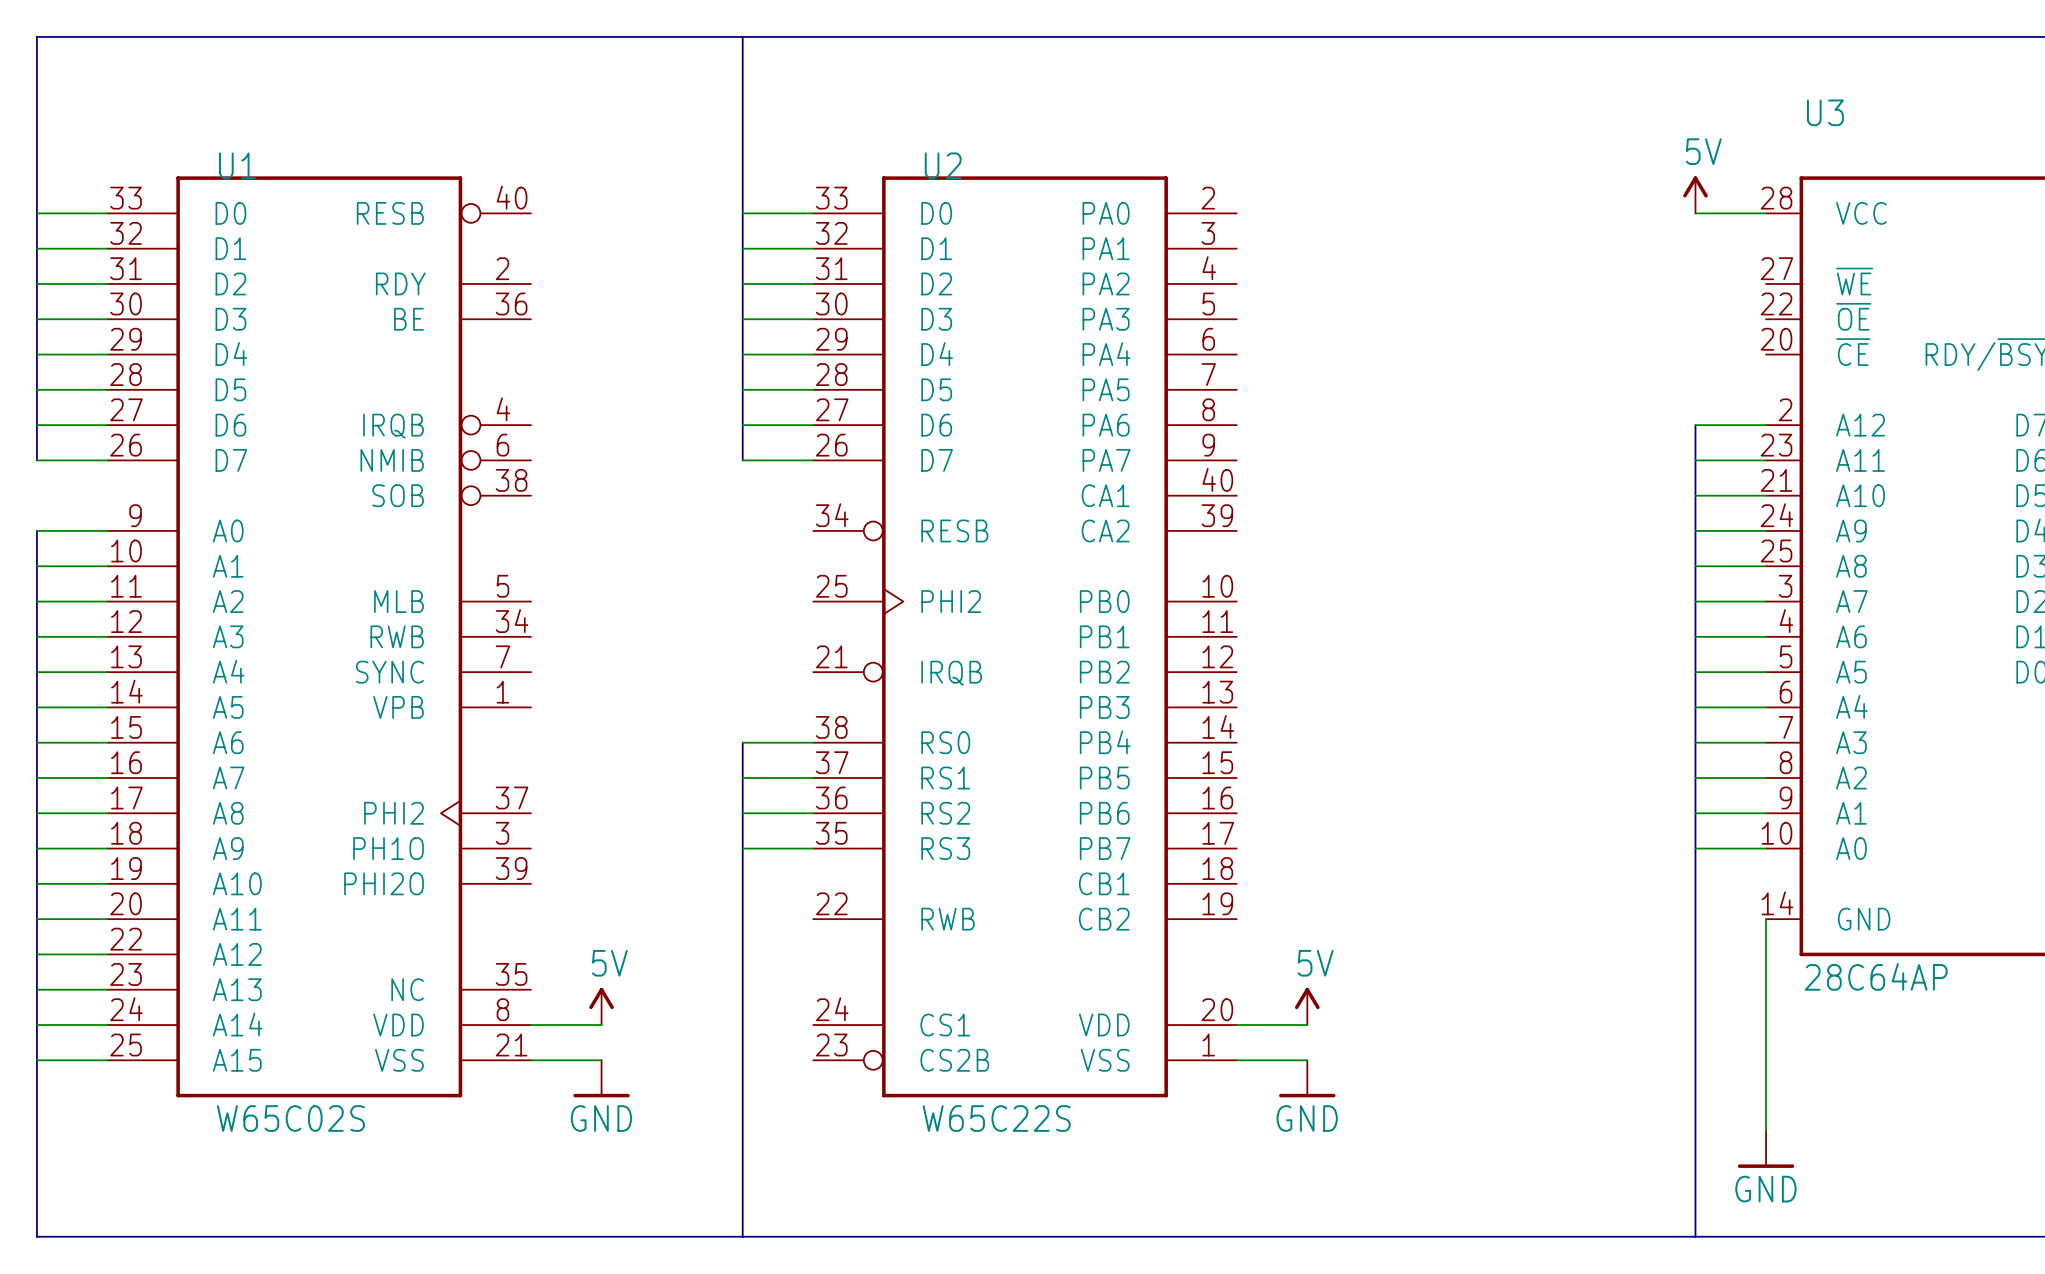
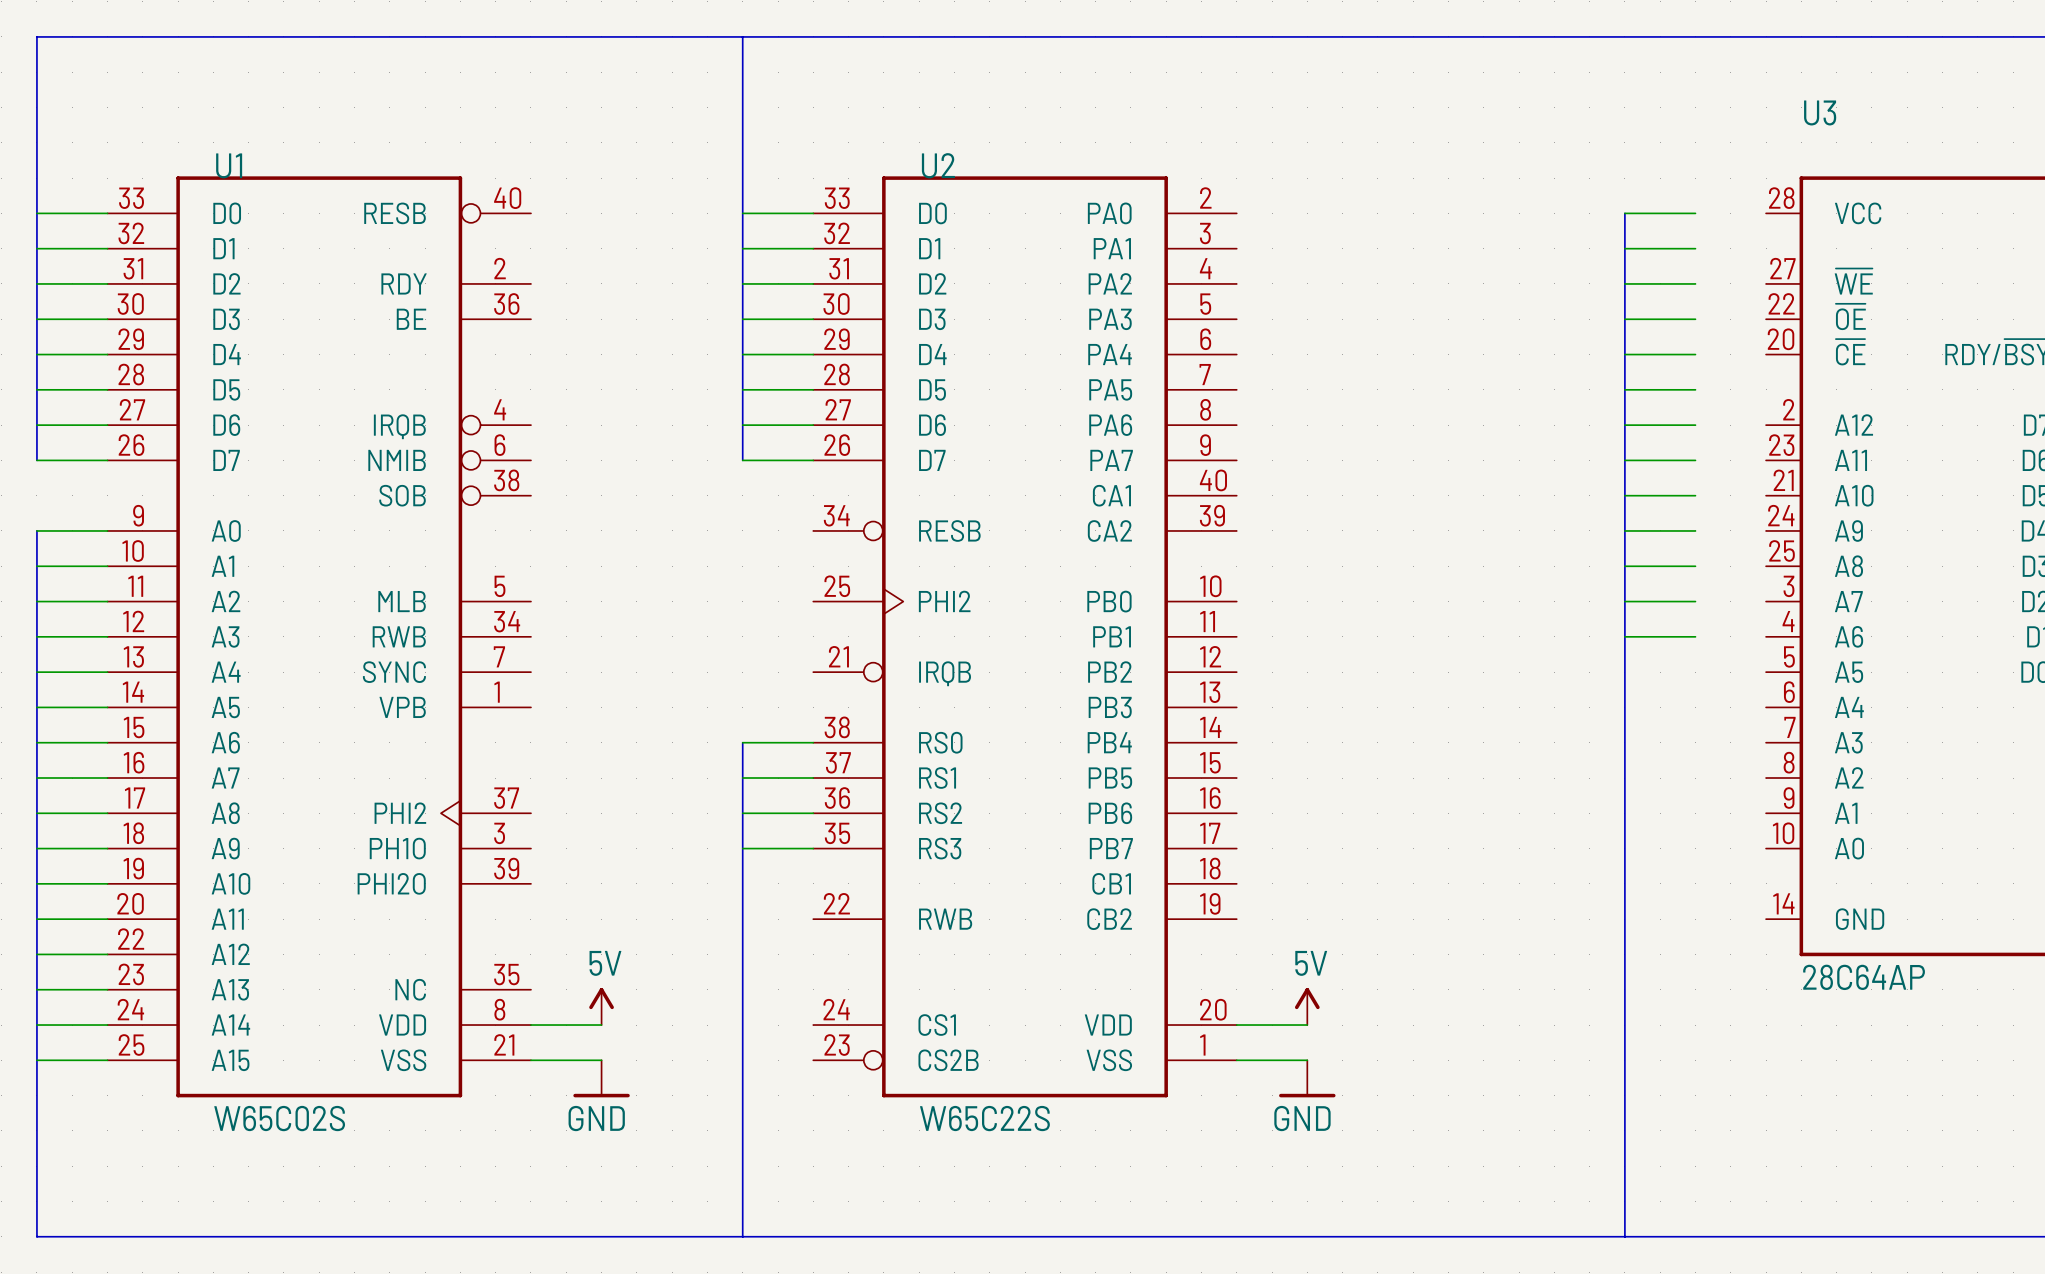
power symbol: 5V (1695, 194) -> none
bus: none -> (1624, 213) (1624, 1236)
wire: (1695, 213) (1766, 213) -> (1695, 213) (1624, 213)
wire: none -> (1624, 248) (1695, 248)
wire: none -> (1624, 283) (1695, 283)
wire: none -> (1624, 319) (1695, 319)
wire: none -> (1624, 354) (1695, 354)
bus: (1695, 425) (1695, 1236) -> none
wire: (1695, 425) (1766, 425) -> (1695, 425) (1624, 425)
wire: (1695, 460) (1766, 460) -> (1695, 460) (1624, 460)
wire: (1695, 495) (1766, 495) -> (1695, 495) (1624, 495)
wire: (1695, 530) (1766, 530) -> (1695, 530) (1624, 530)
wire: (1695, 566) (1766, 566) -> (1695, 566) (1624, 566)
wire: (1695, 601) (1766, 601) -> (1695, 601) (1624, 601)
wire: (1695, 636) (1766, 636) -> (1695, 636) (1624, 636)
wire: (1695, 672) (1766, 672) -> (1624, 389) (1695, 389)
wire: (1695, 707) (1766, 707) -> none
wire: (1695, 742) (1766, 742) -> none
wire: (1695, 778) (1766, 778) -> none
wire: (1695, 813) (1766, 813) -> none
wire: (1695, 848) (1766, 848) -> none
wire: (1766, 919) (1766, 1130) -> none
power symbol: GND (1766, 1149) -> none

